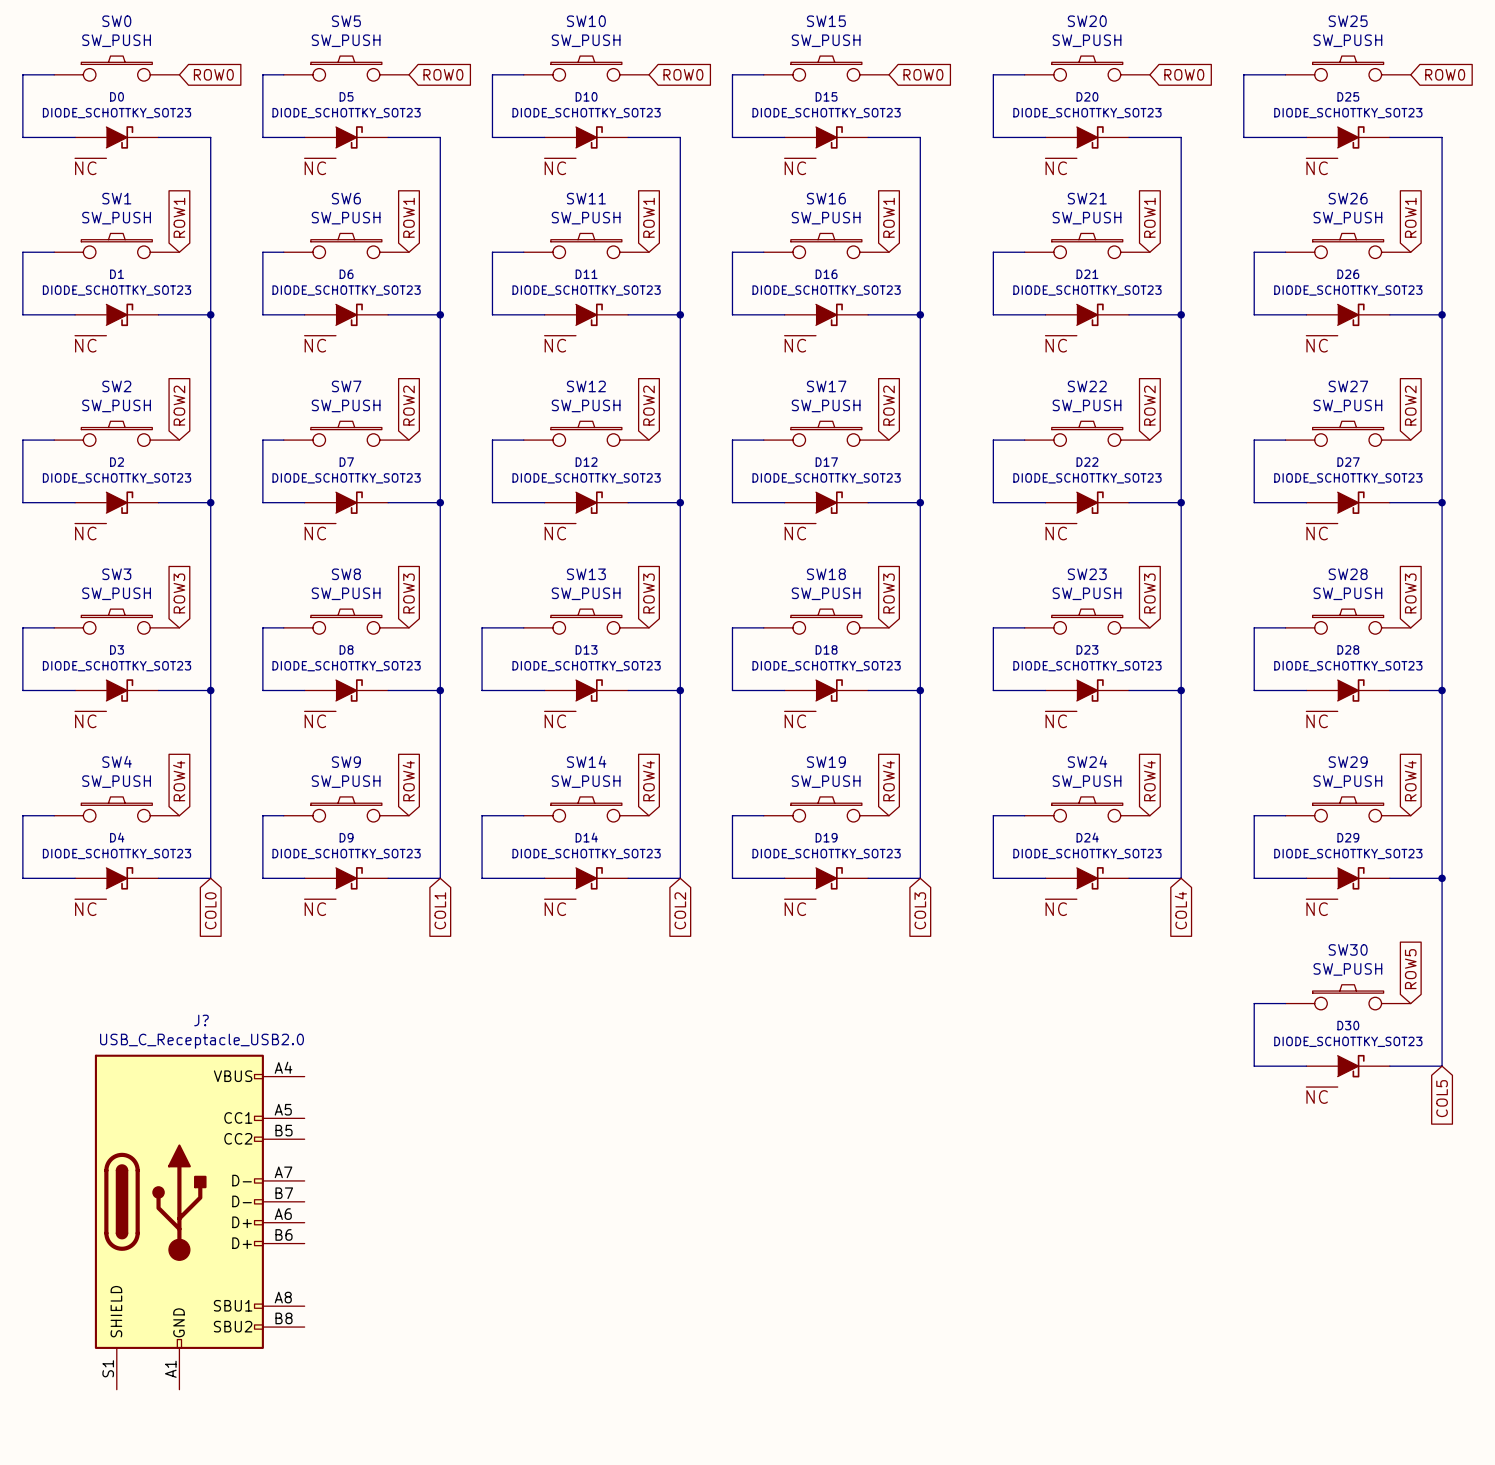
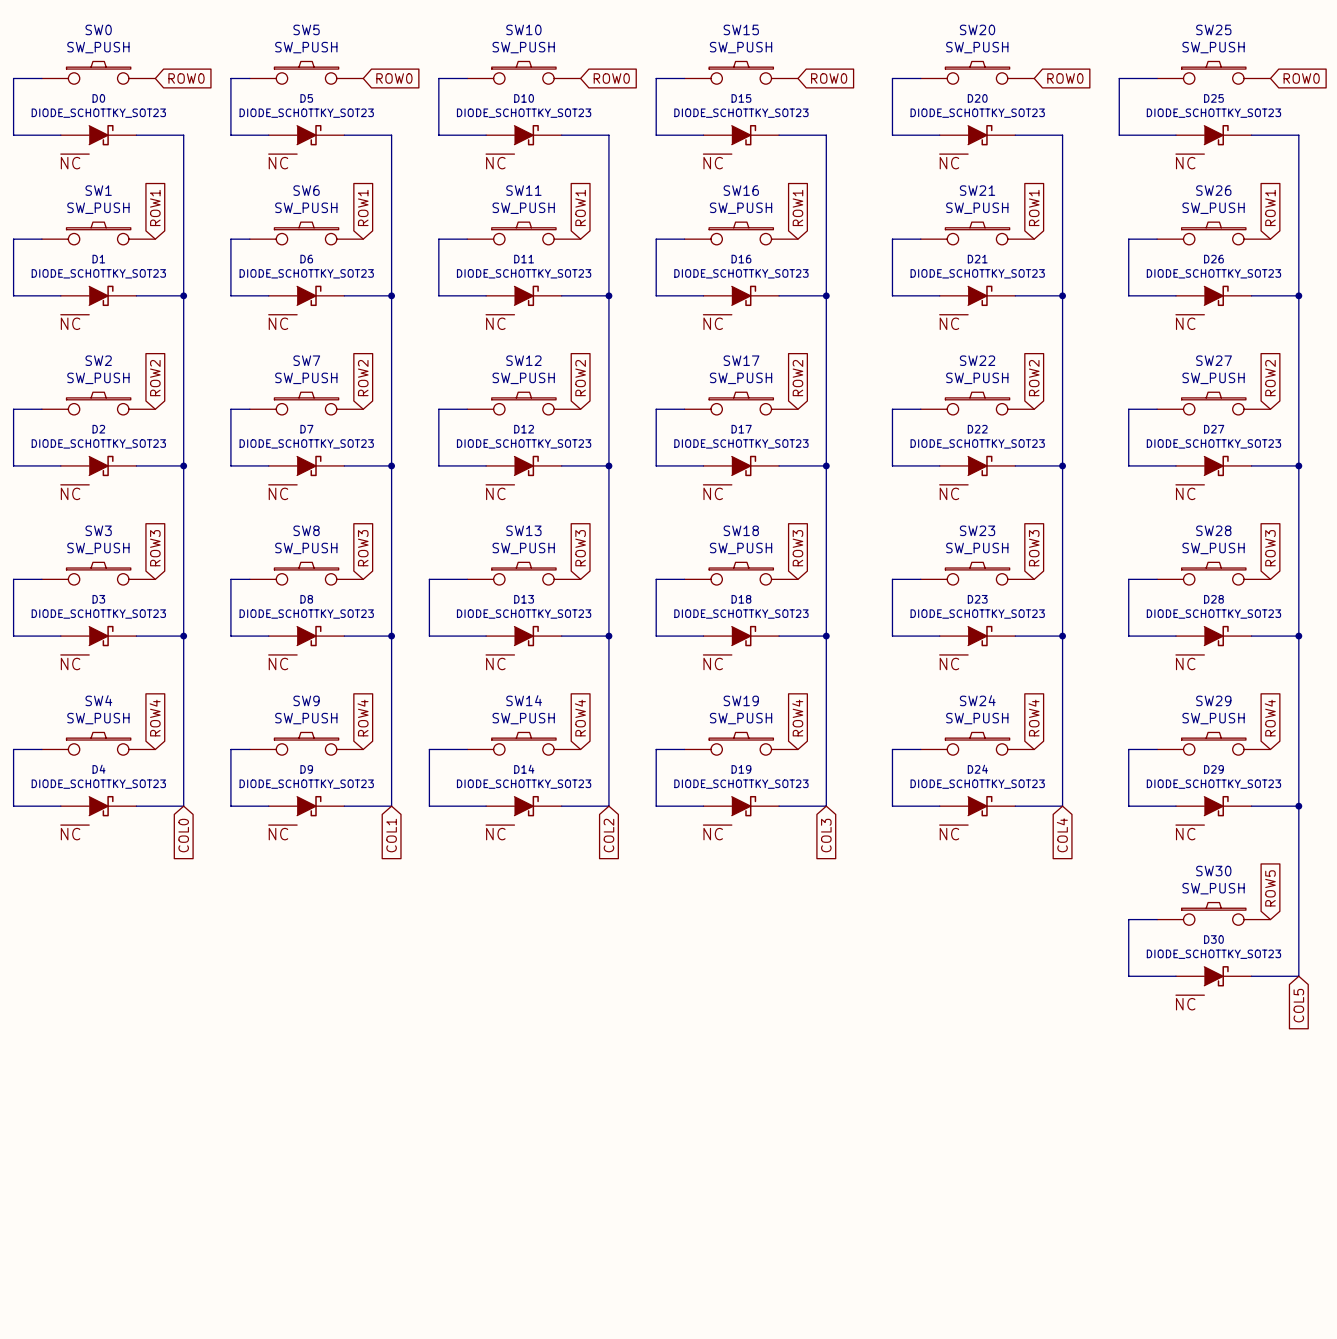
J?: USB_C_Receptacle_USB2.0 (199, 1222) -> none

